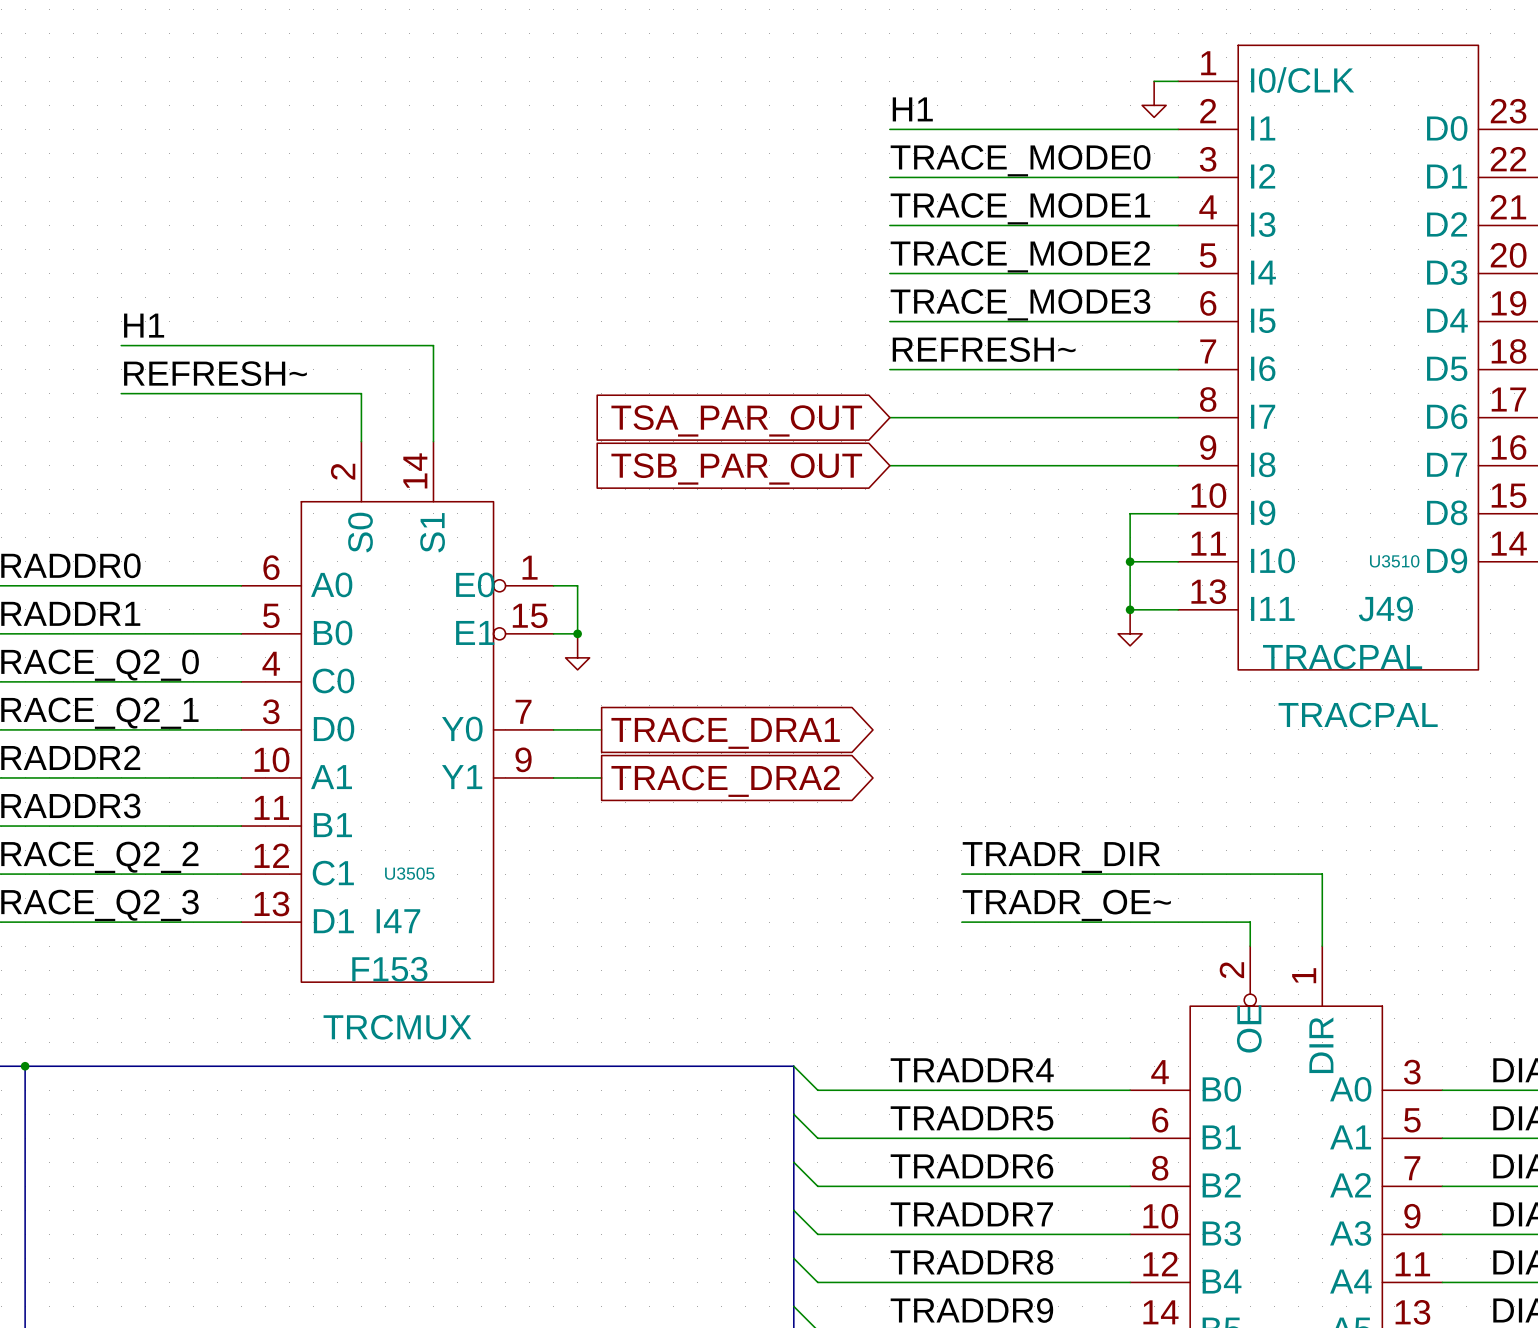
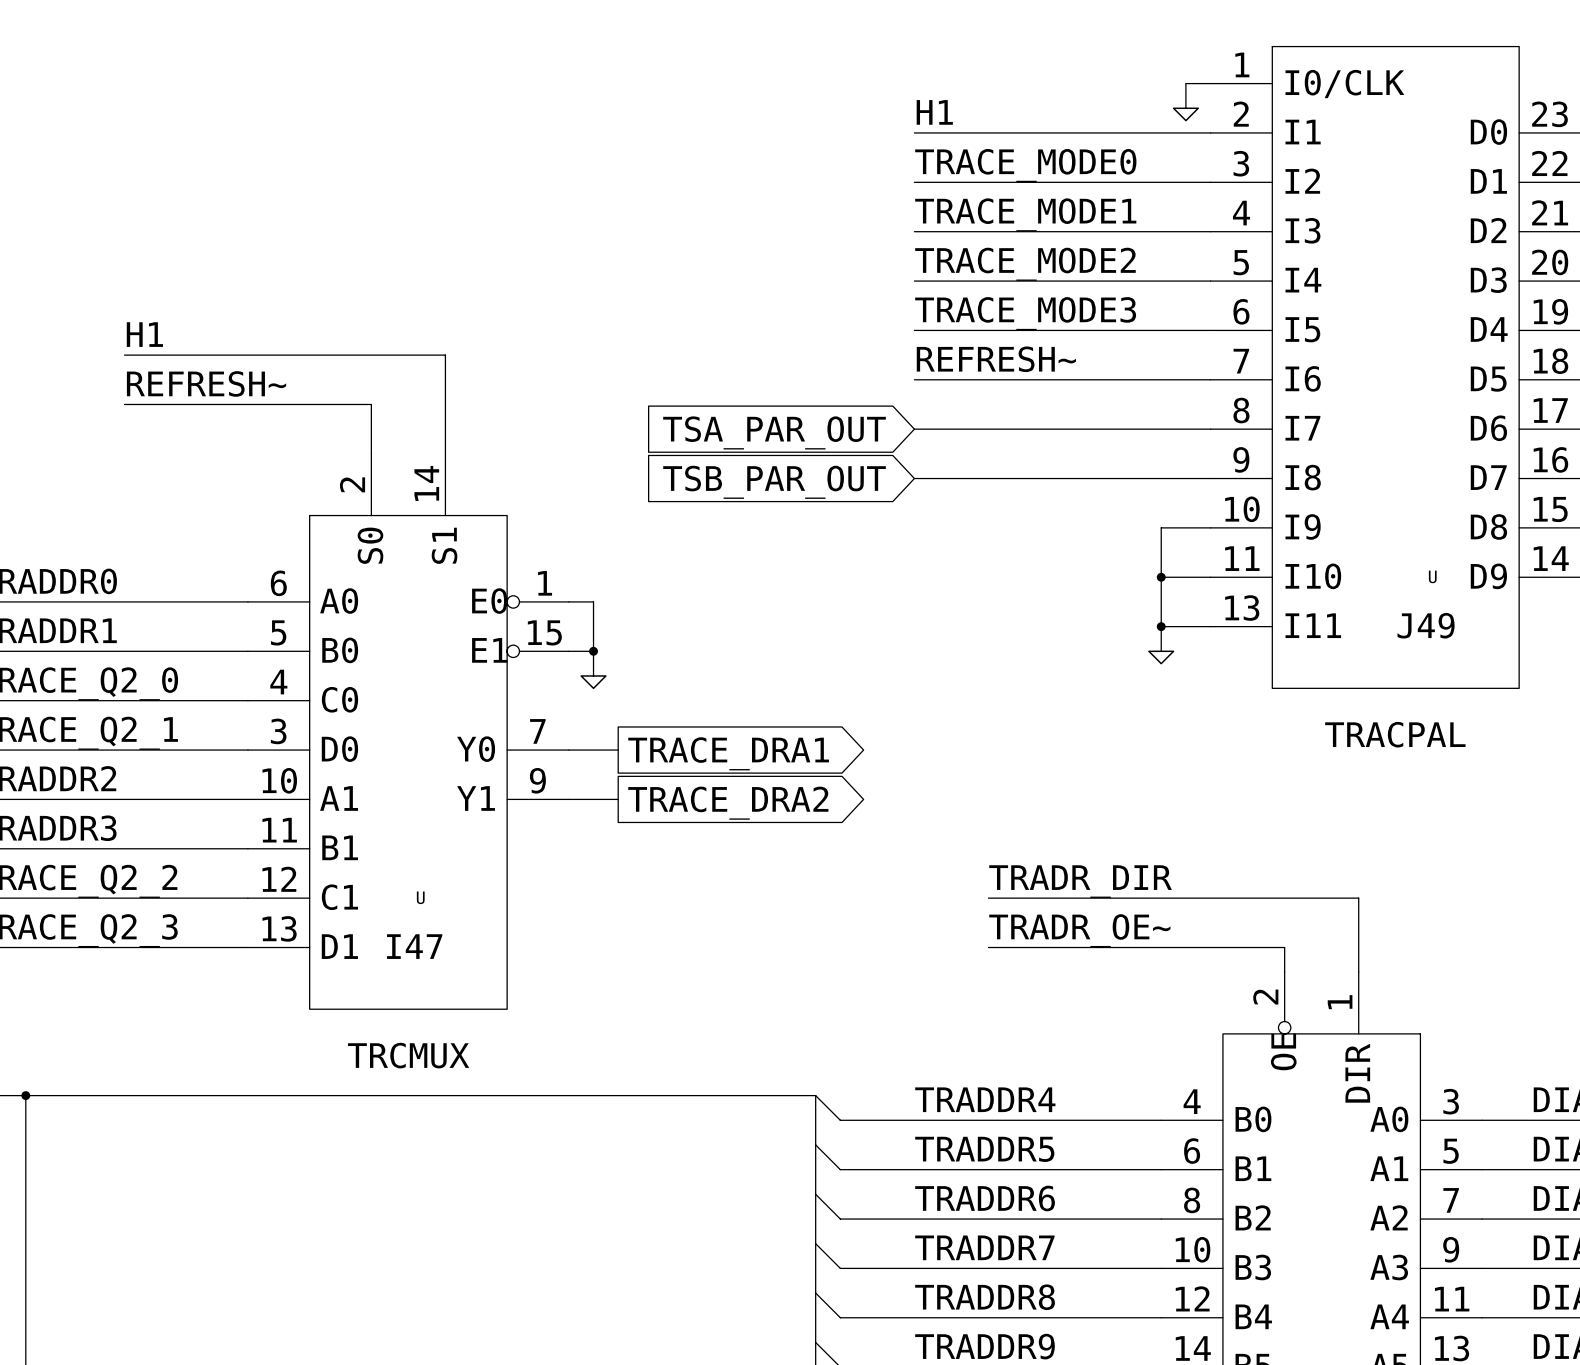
U3510 name: U3510 (1394, 561) -> U (1432, 576)
U3510 value: TRACPAL (1342, 656) -> none
U3505 name: U3505 (409, 873) -> U (420, 897)
U3505 value: F153 (389, 969) -> none

